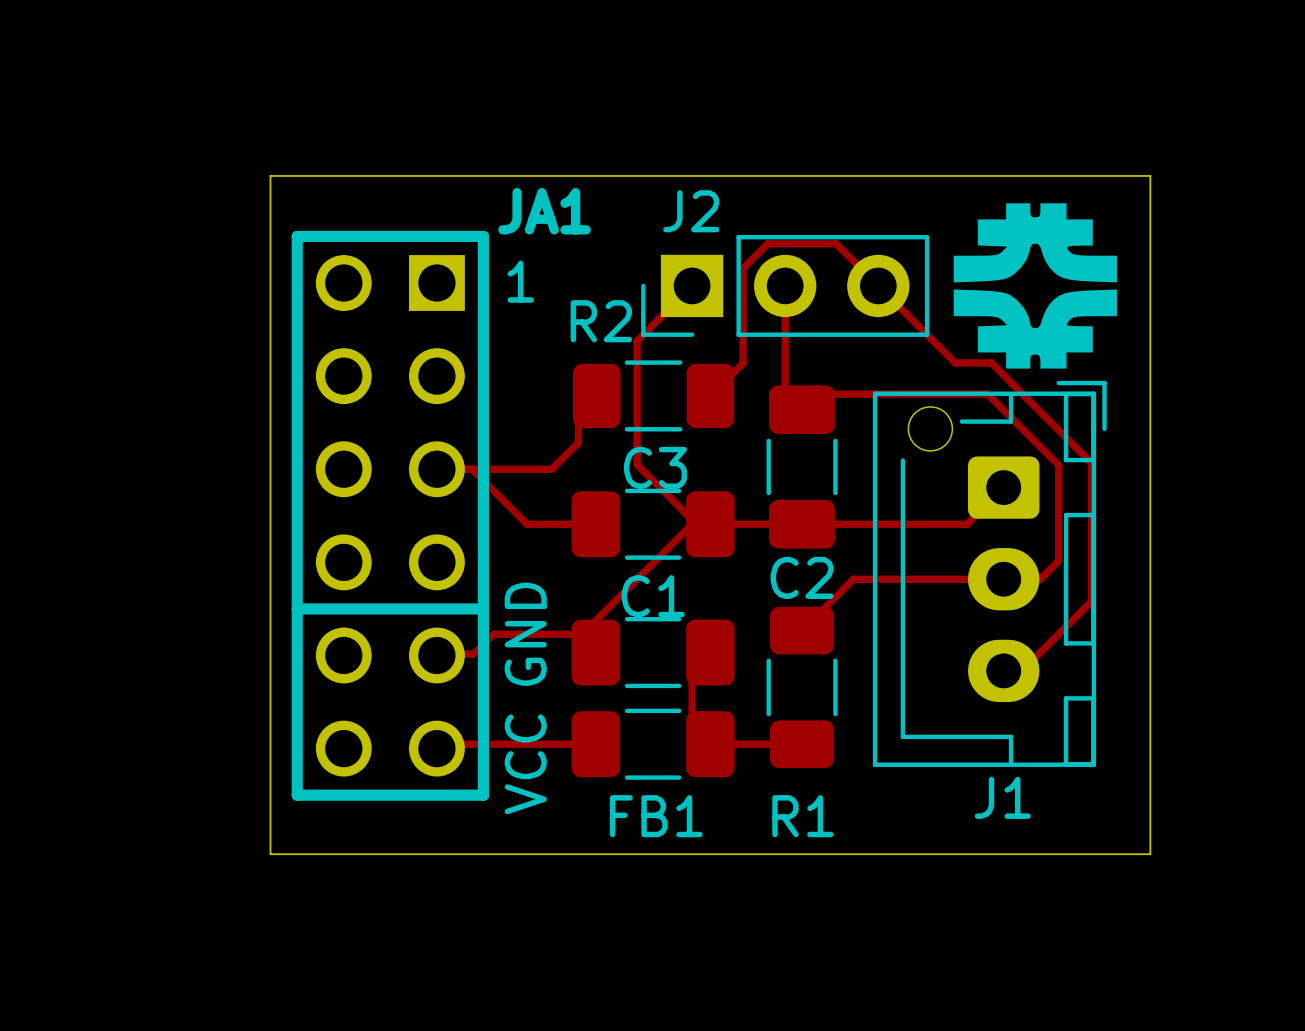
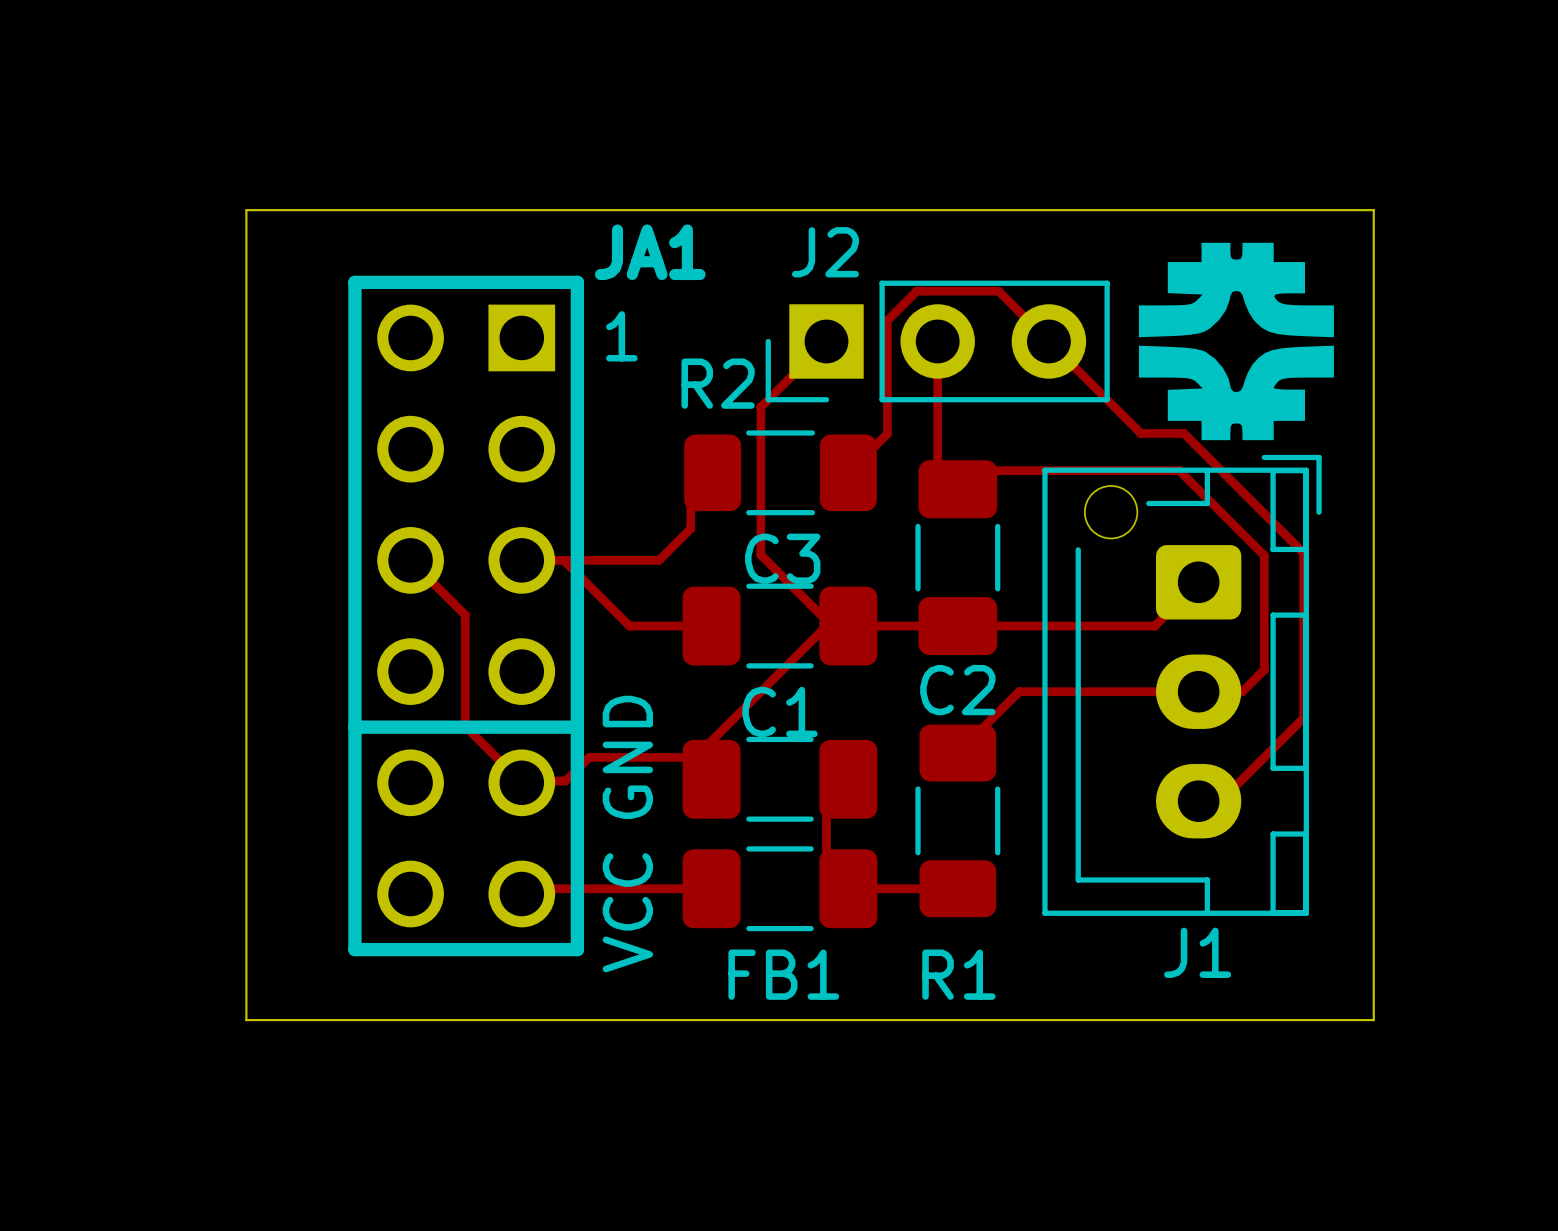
board edge: (270, 175) (270, 854) -> (323, 210) (246, 210) (246, 1020) (323, 1020)
top track: none -> (410, 560) (465, 615) (465, 726) (521, 782)

